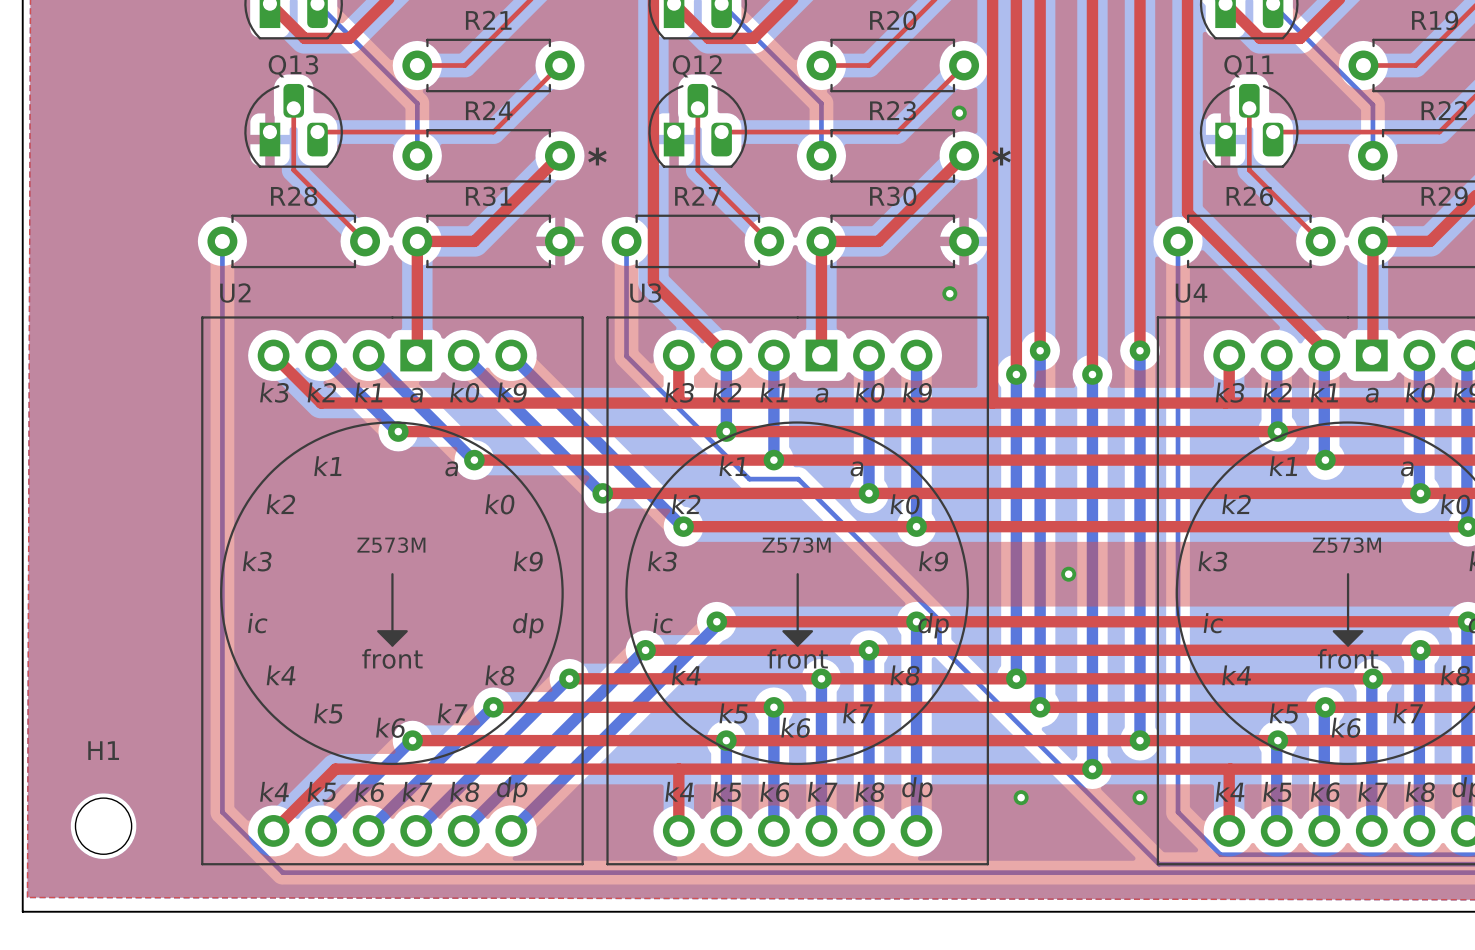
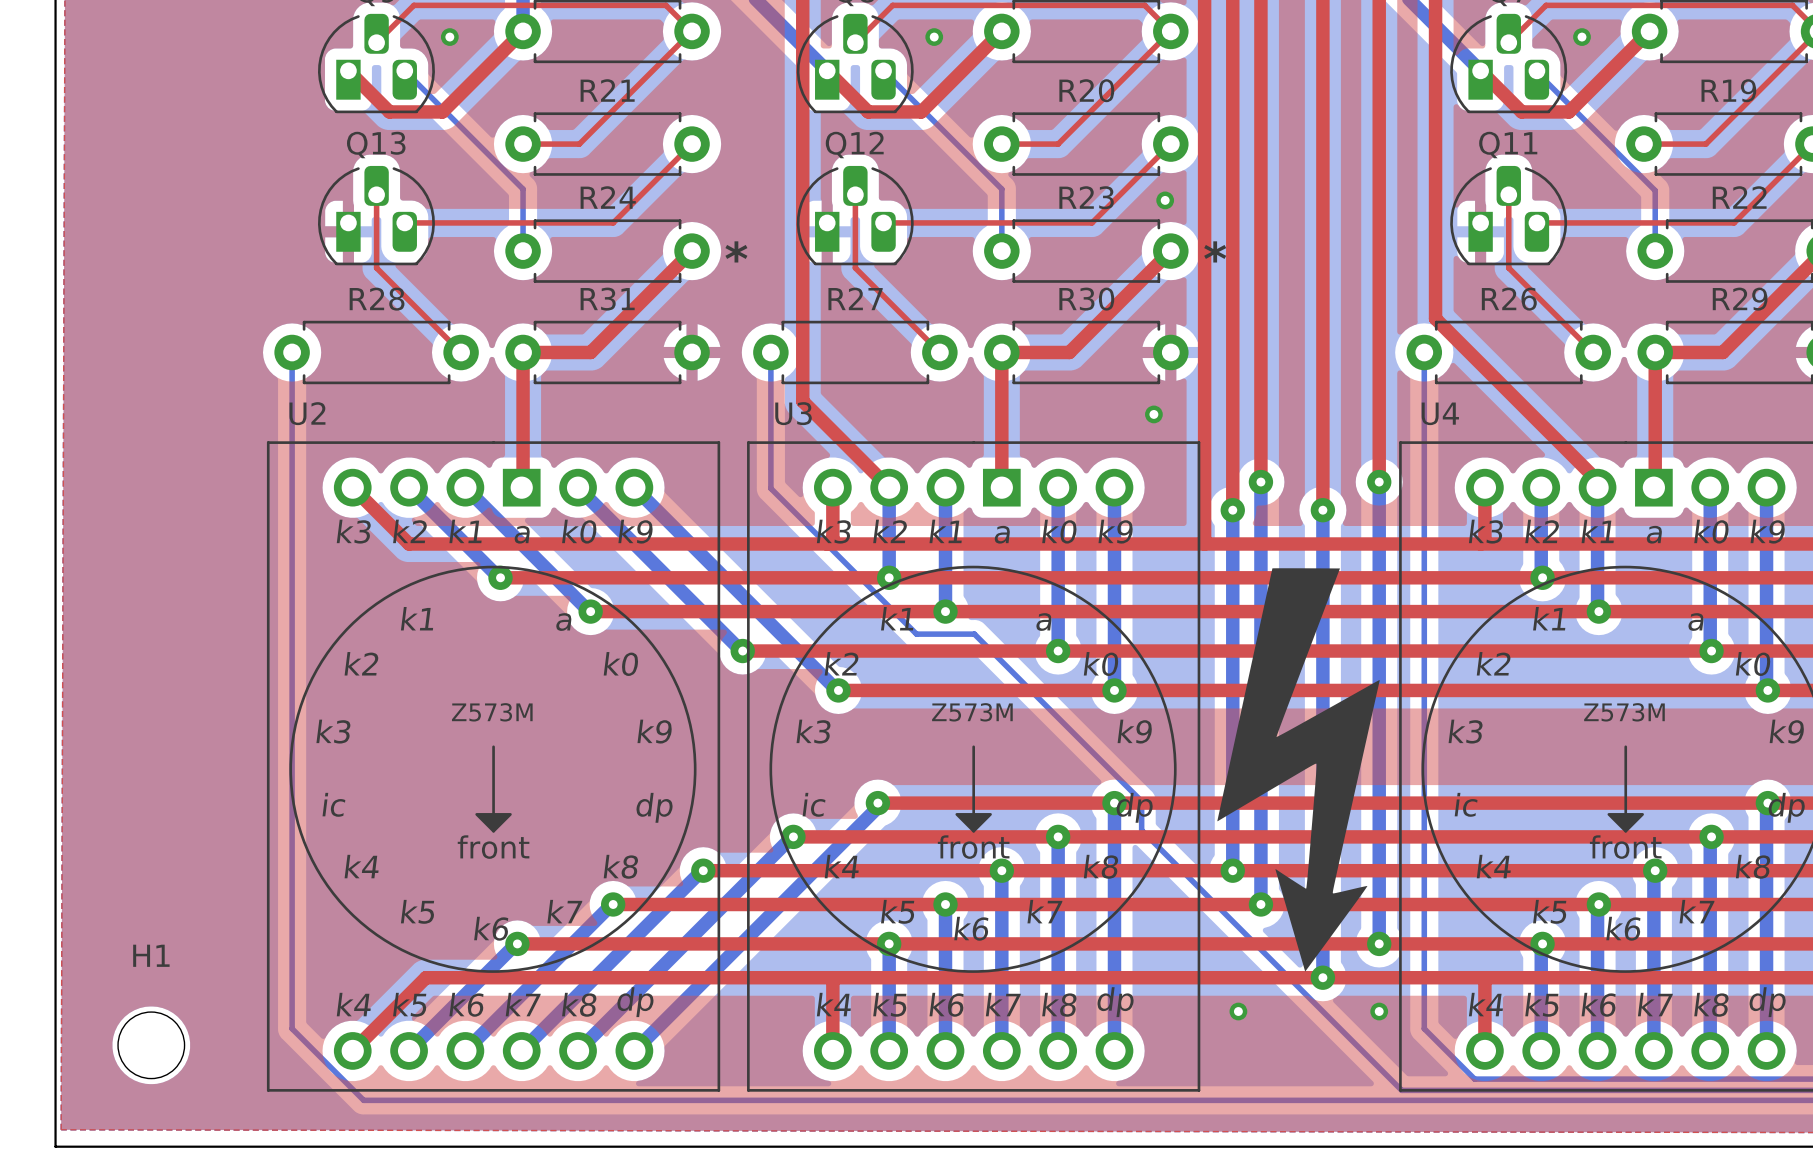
drawing: none -> [1217, 568, 1380, 972]

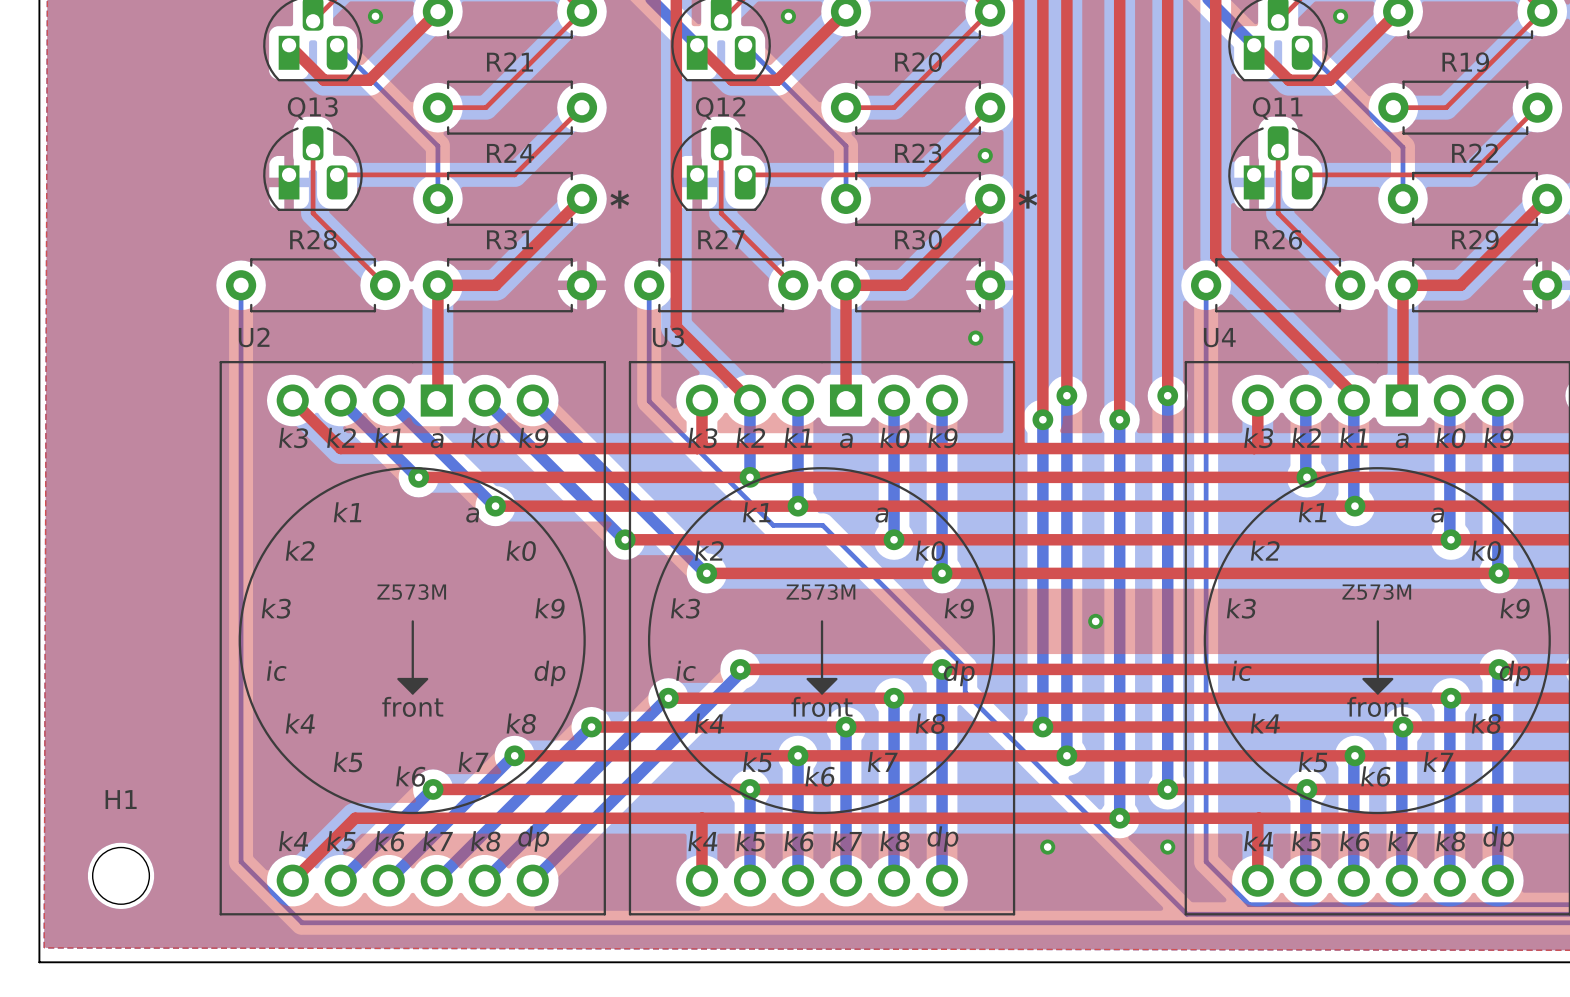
drawing: [1217, 568, 1380, 972] -> none

